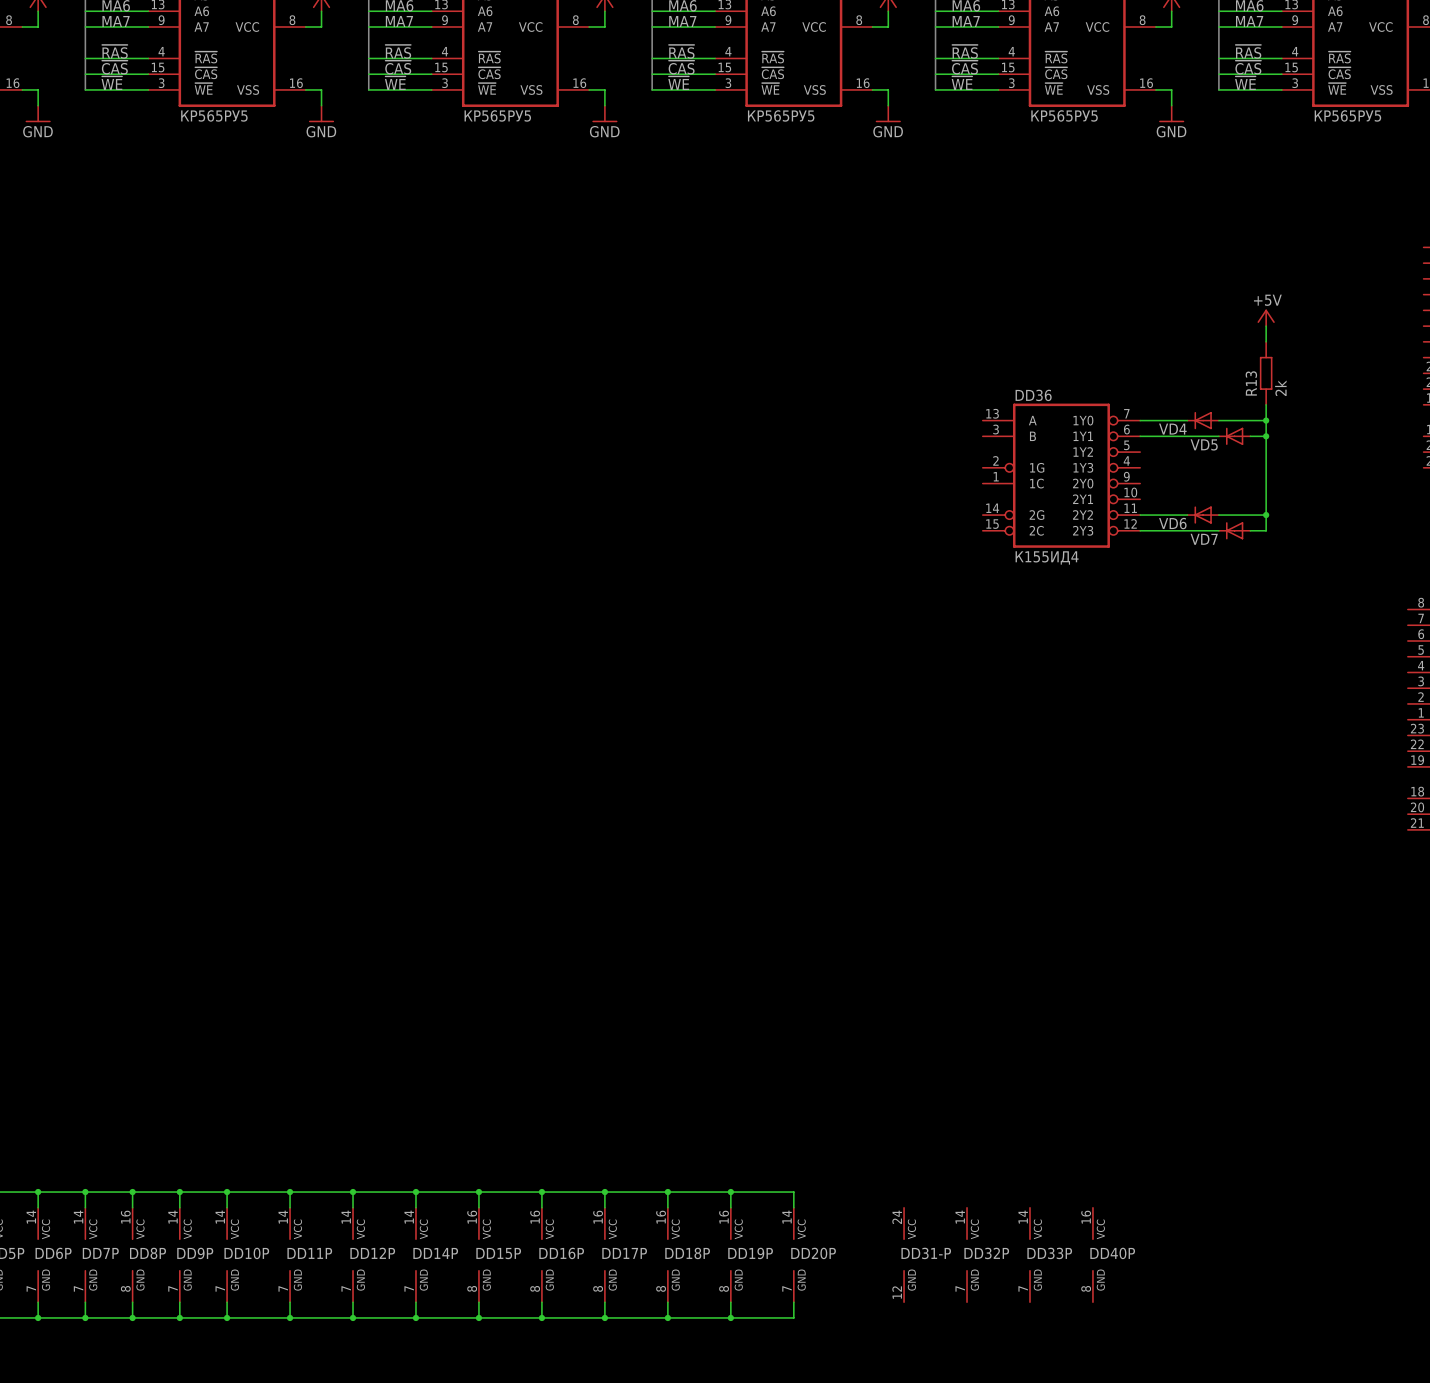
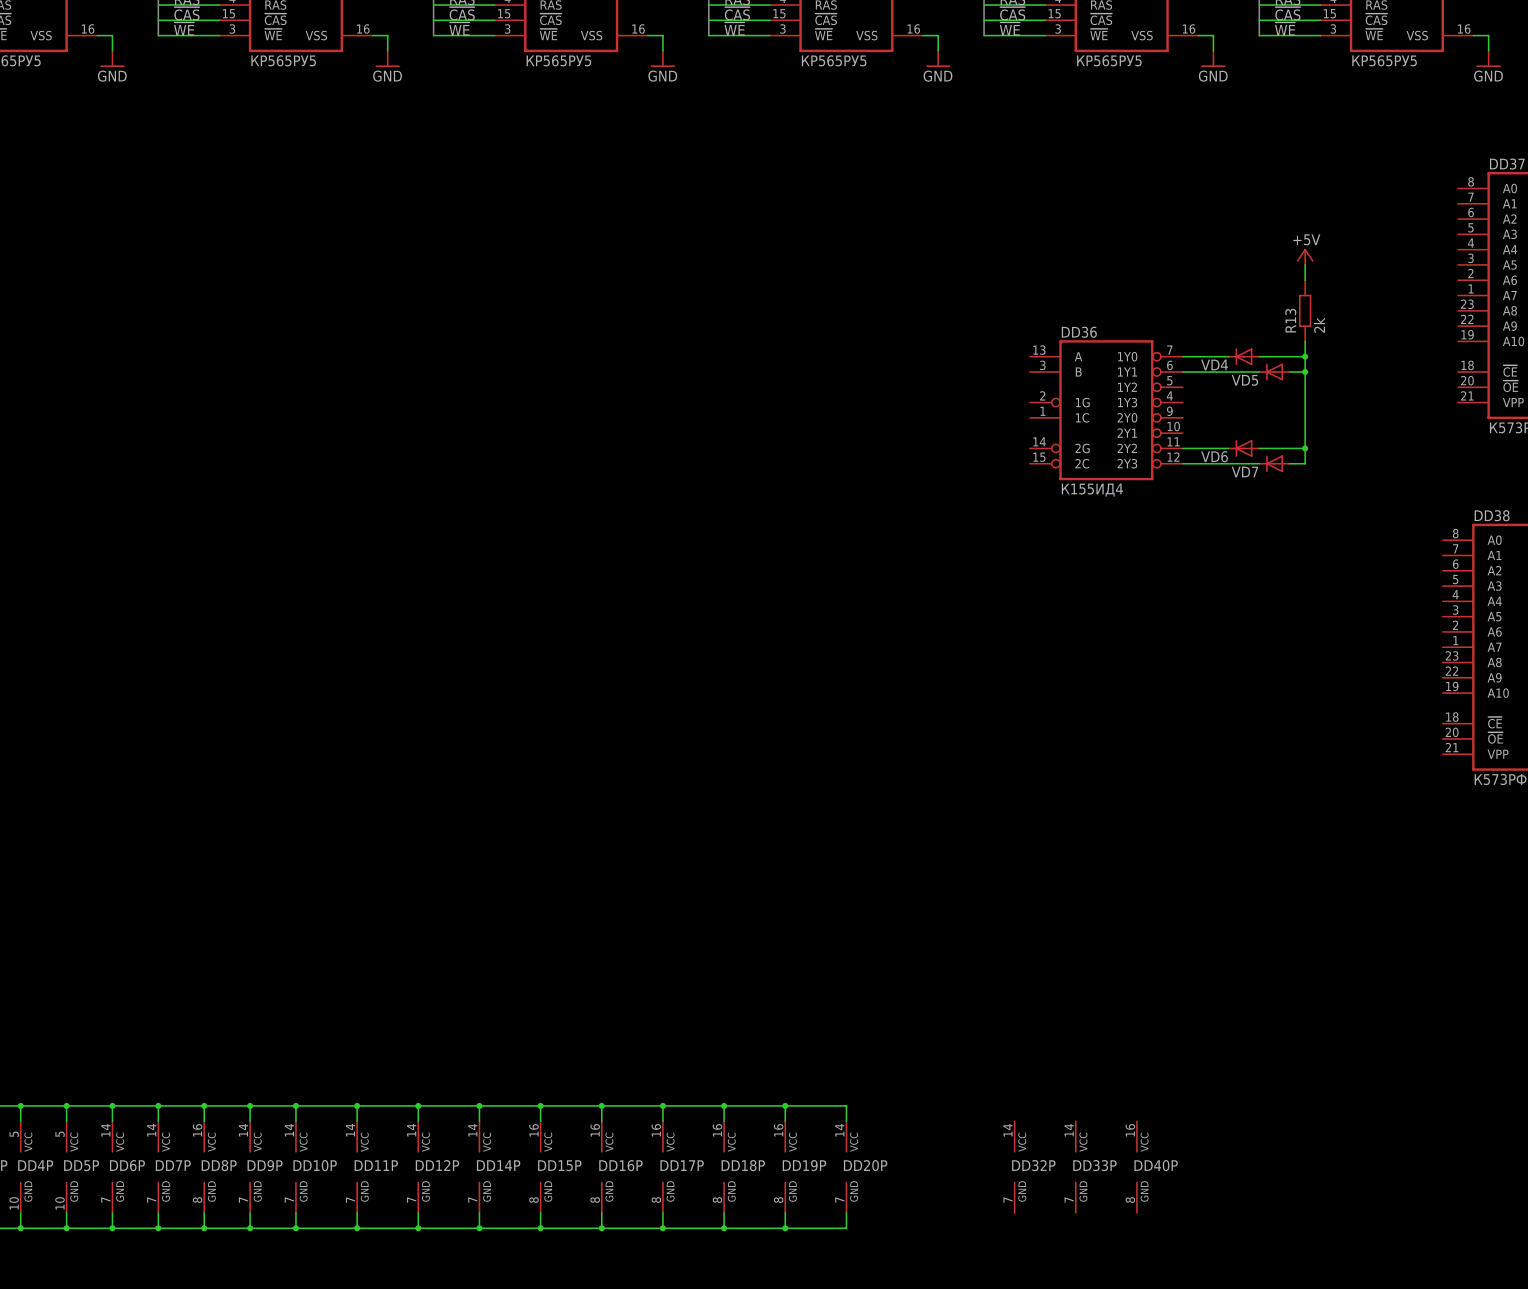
DD31-P: (904, 1255) -> none

